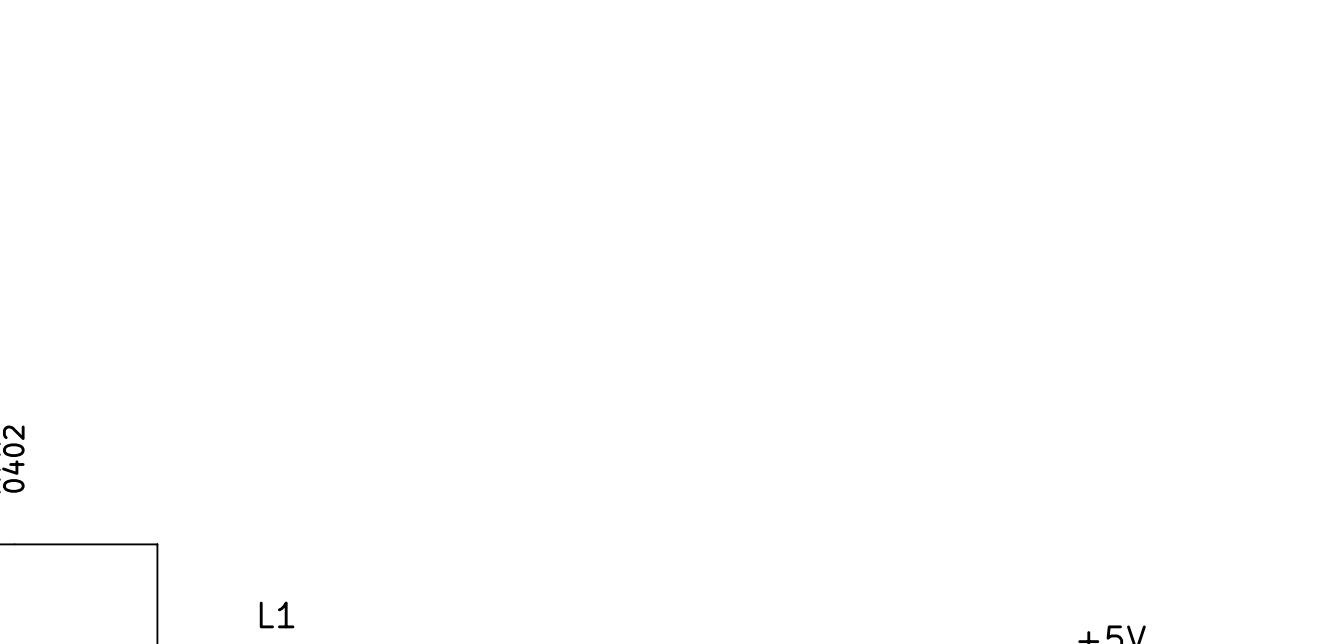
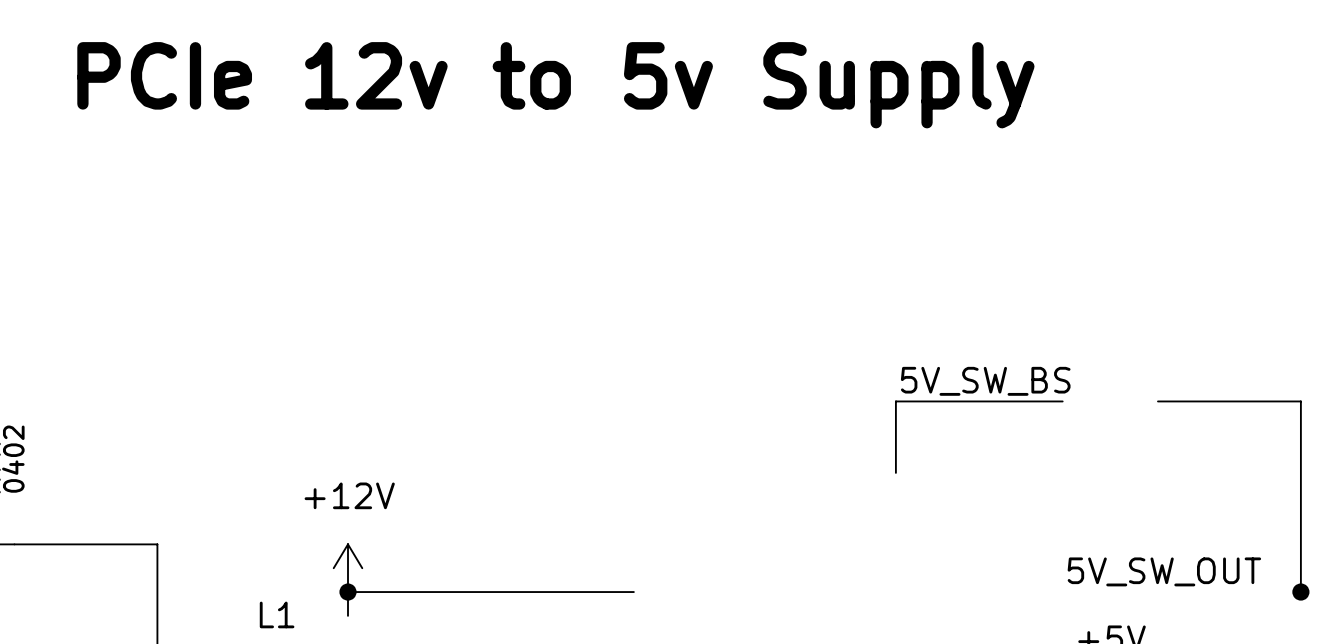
text: none -> PCIe 12v to 5v Supply (555, 85)
label: none -> 5V_SW_BS (985, 381)
wire: none -> (1062, 401) (895, 401) (895, 472)
wire: none -> (1157, 401) (1300, 401) (1300, 592)
power symbol: none -> +12V (348, 568)
label: none -> 5V_SW_OUT (1164, 571)
junction: none -> (348, 592)
wire: none -> (633, 592) (348, 592) (348, 615)
junction: none -> (1300, 592)

